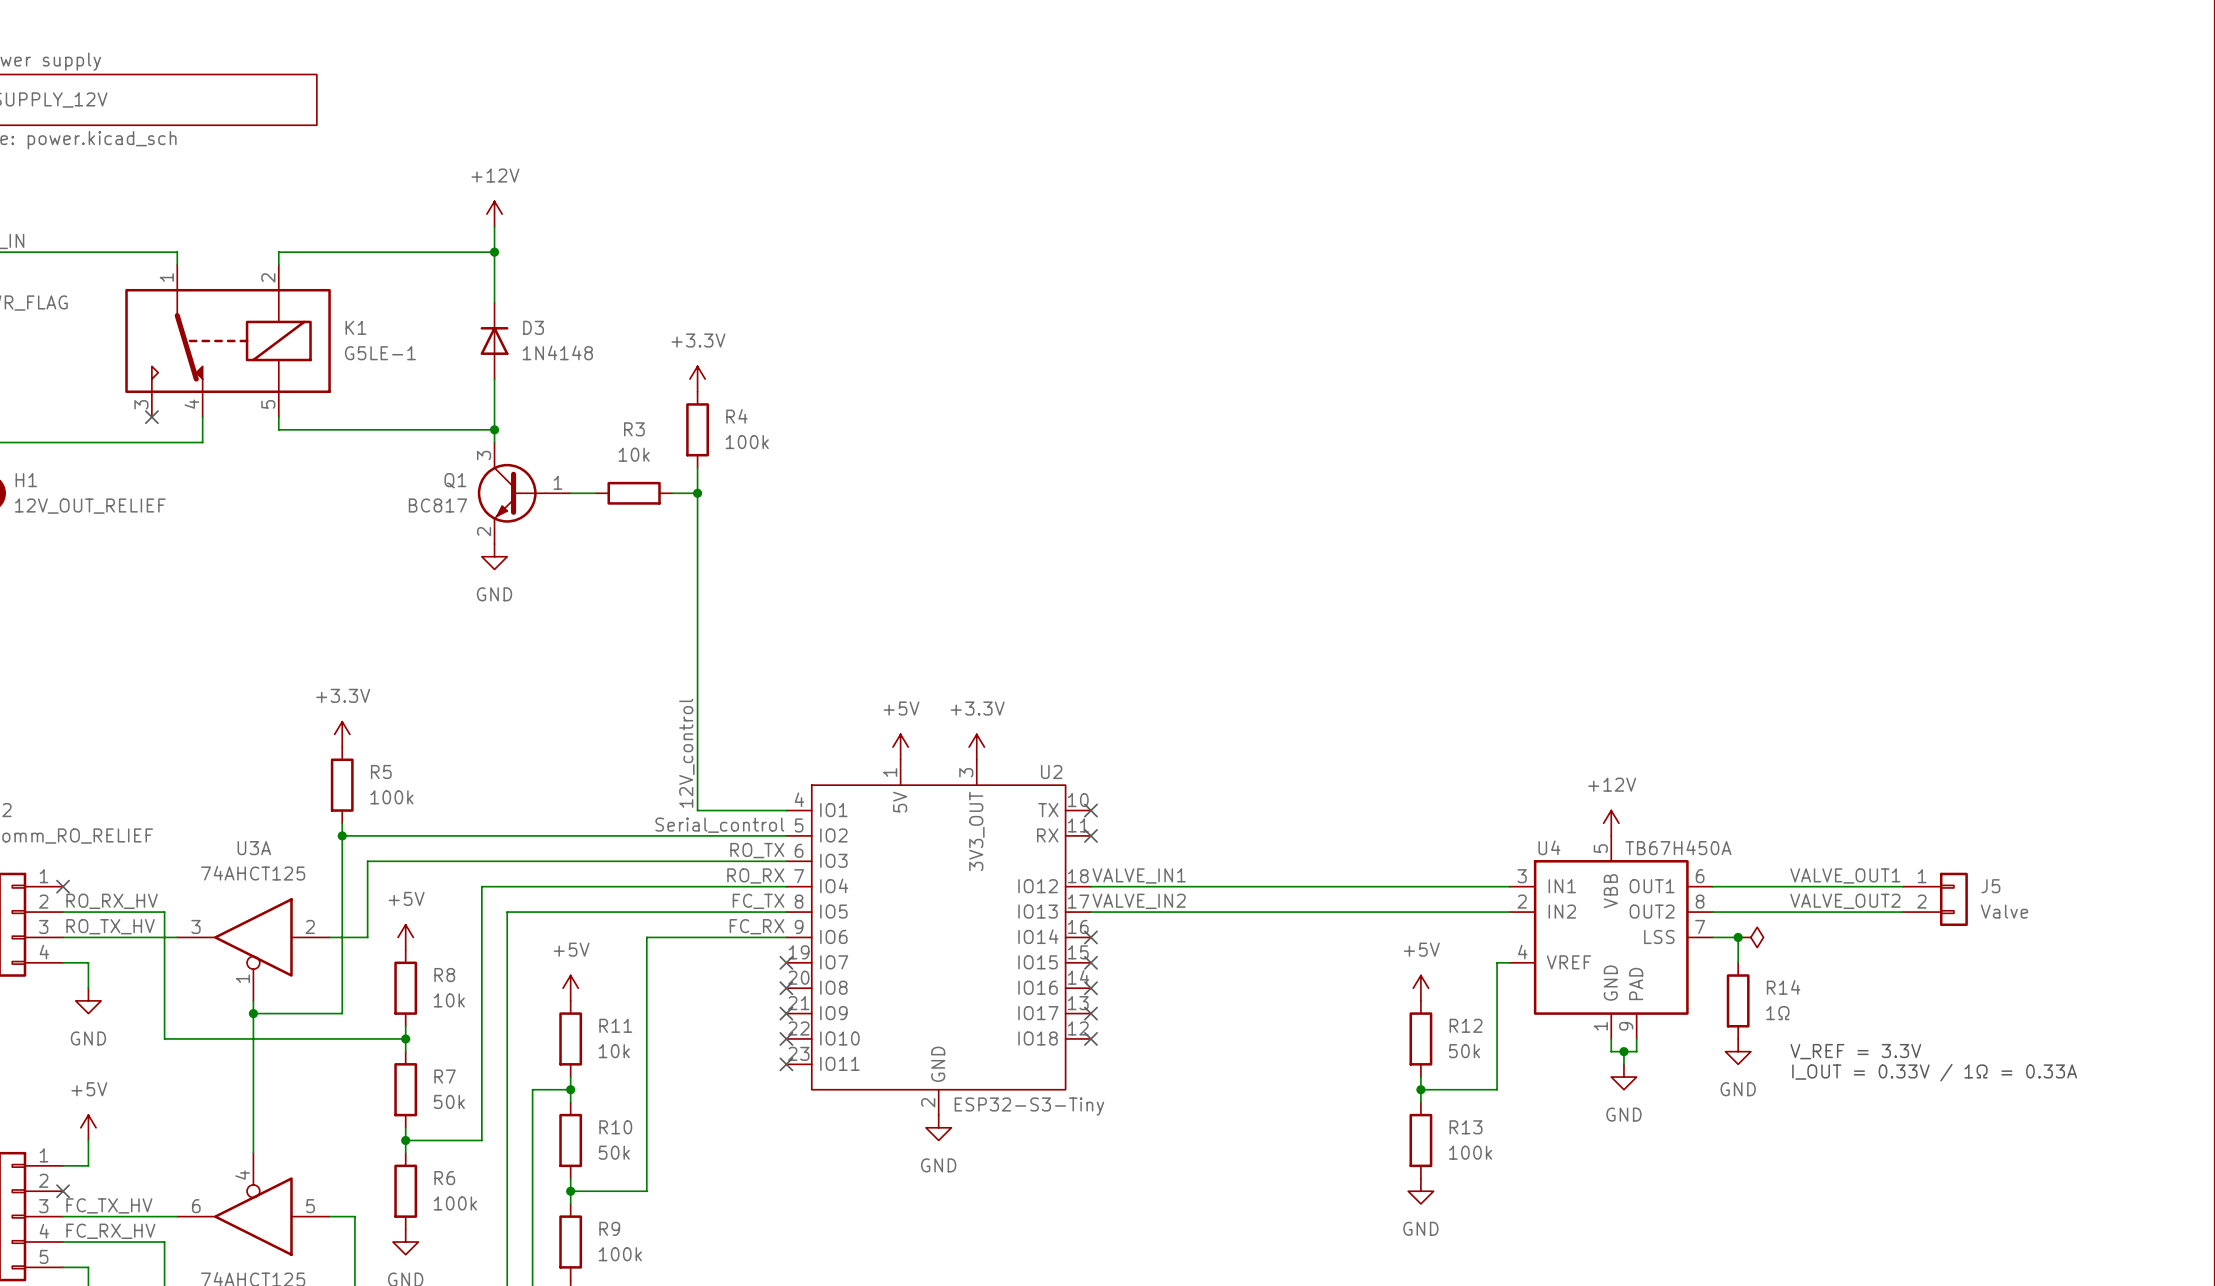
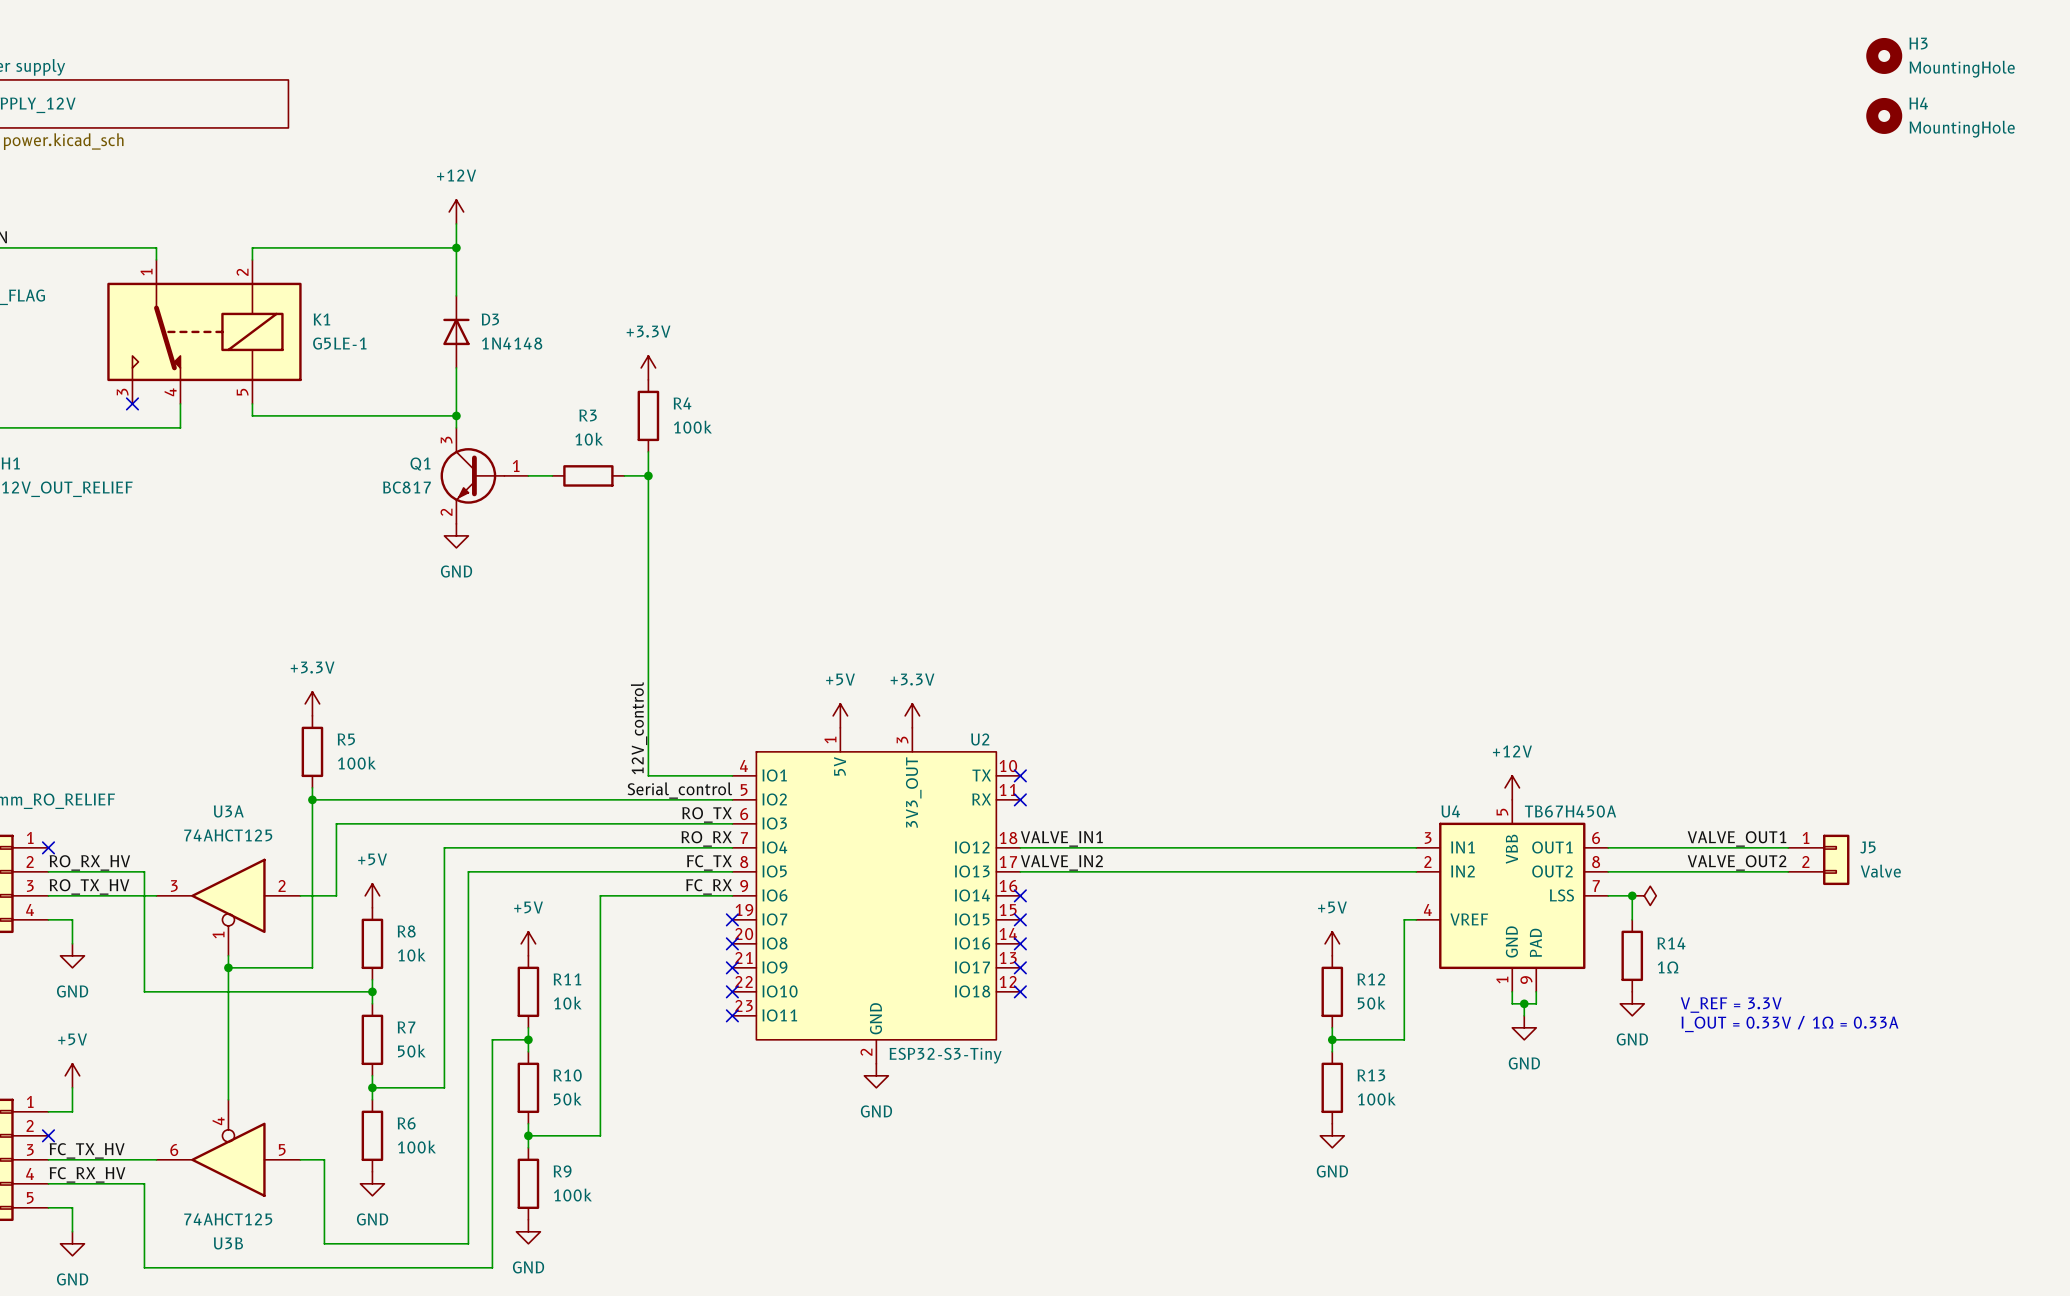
H3: none -> MountingHole (1884, 55)
H4: none -> MountingHole (1884, 115)

